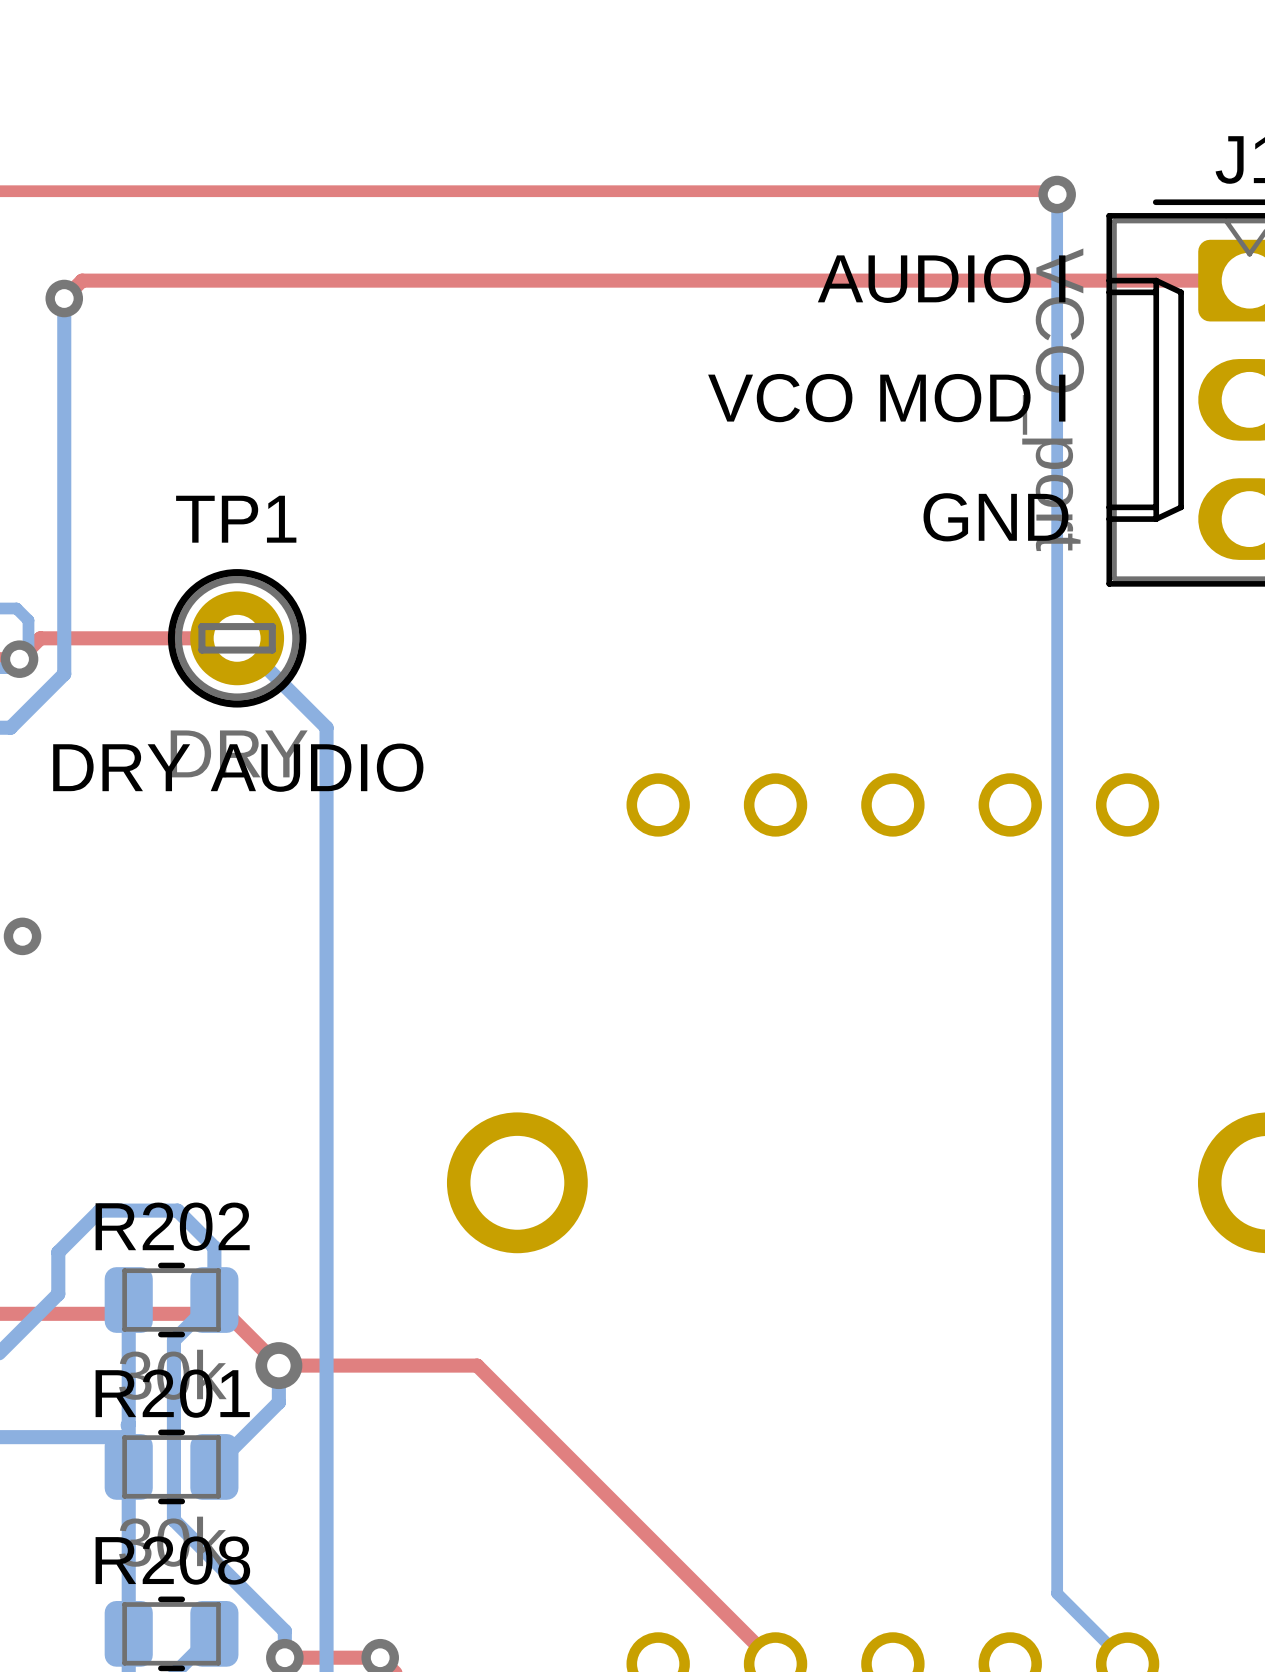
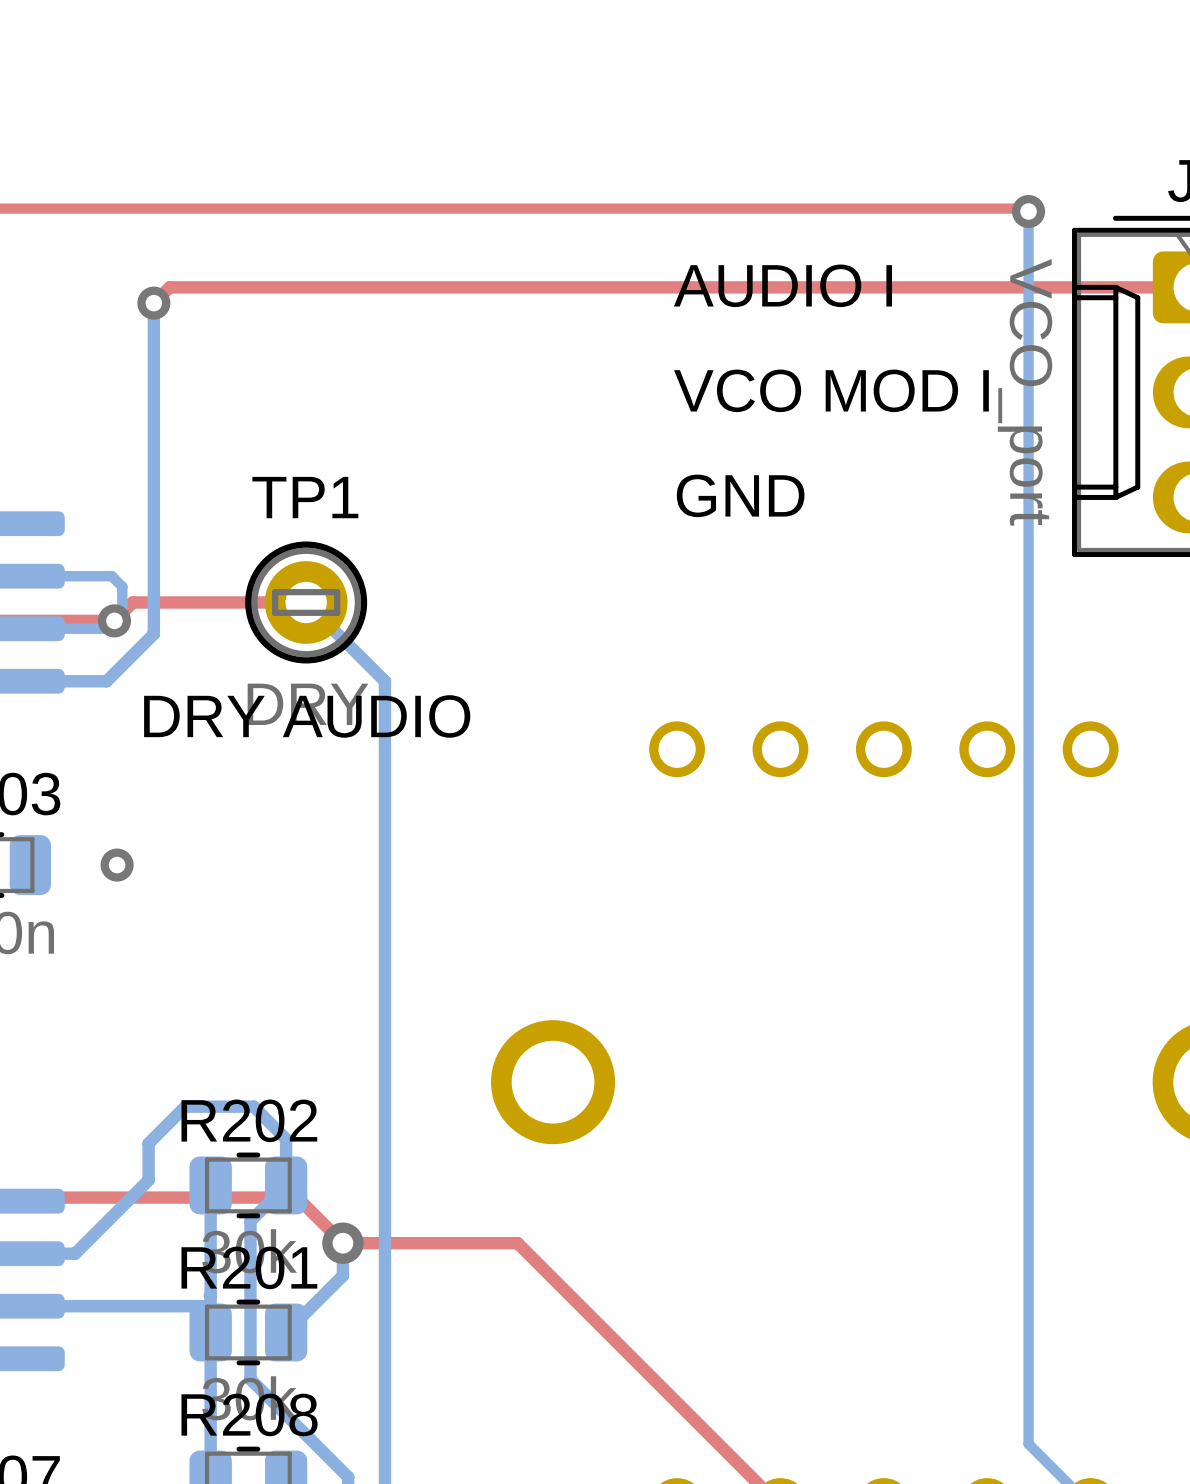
text position: AUDIO I (941, 278) -> AUDIO I (782, 285)
text position: VCO MOD I (886, 398) -> VCO MOD I (831, 390)
text position: GND (996, 517) -> GND (740, 495)

